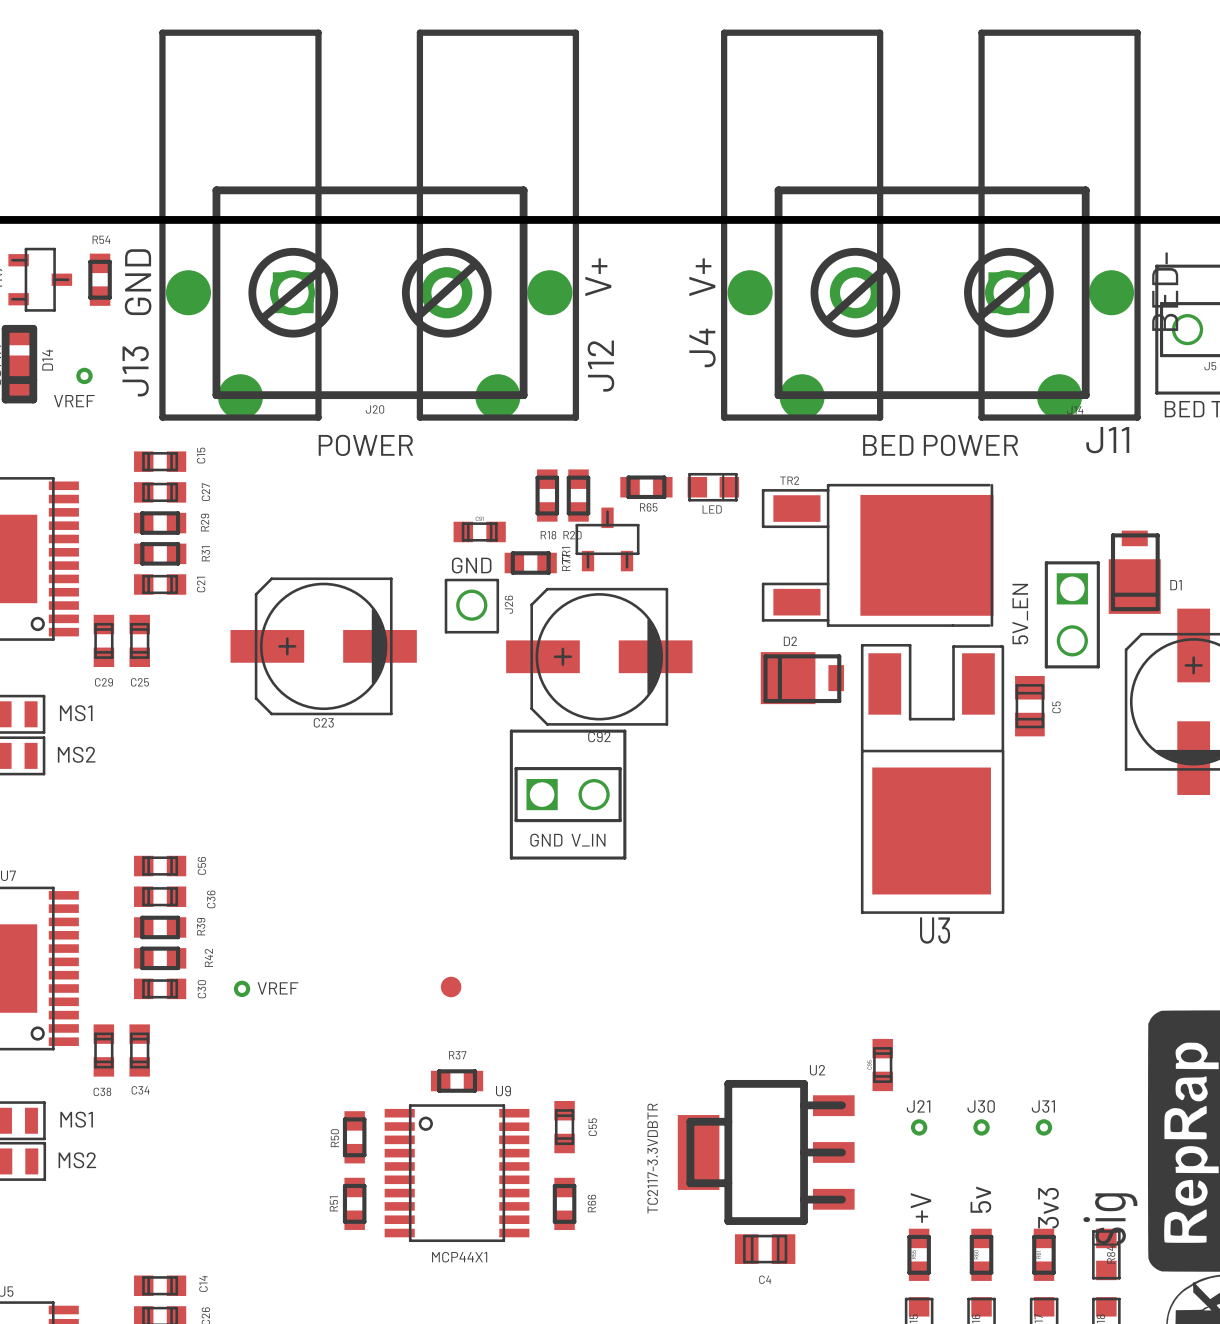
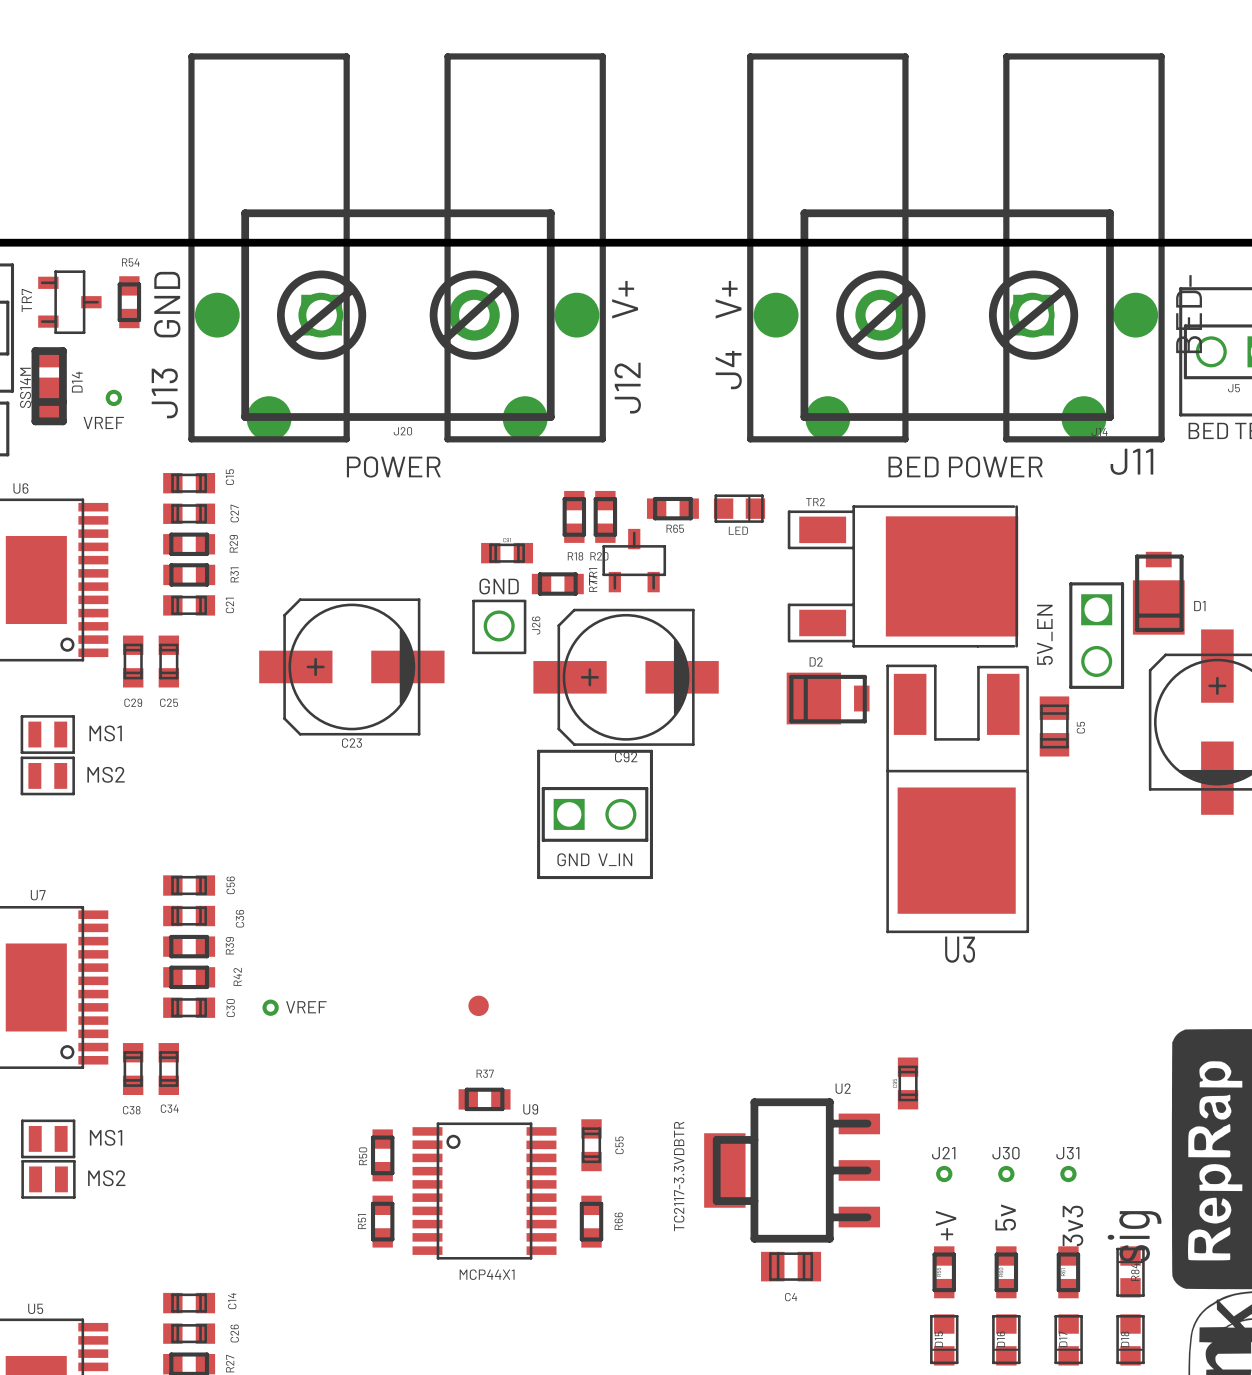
J21 position: (919, 1127) -> (944, 1174)
J30 position: (981, 1127) -> (1006, 1174)
J31 position: (1043, 1127) -> (1068, 1174)

